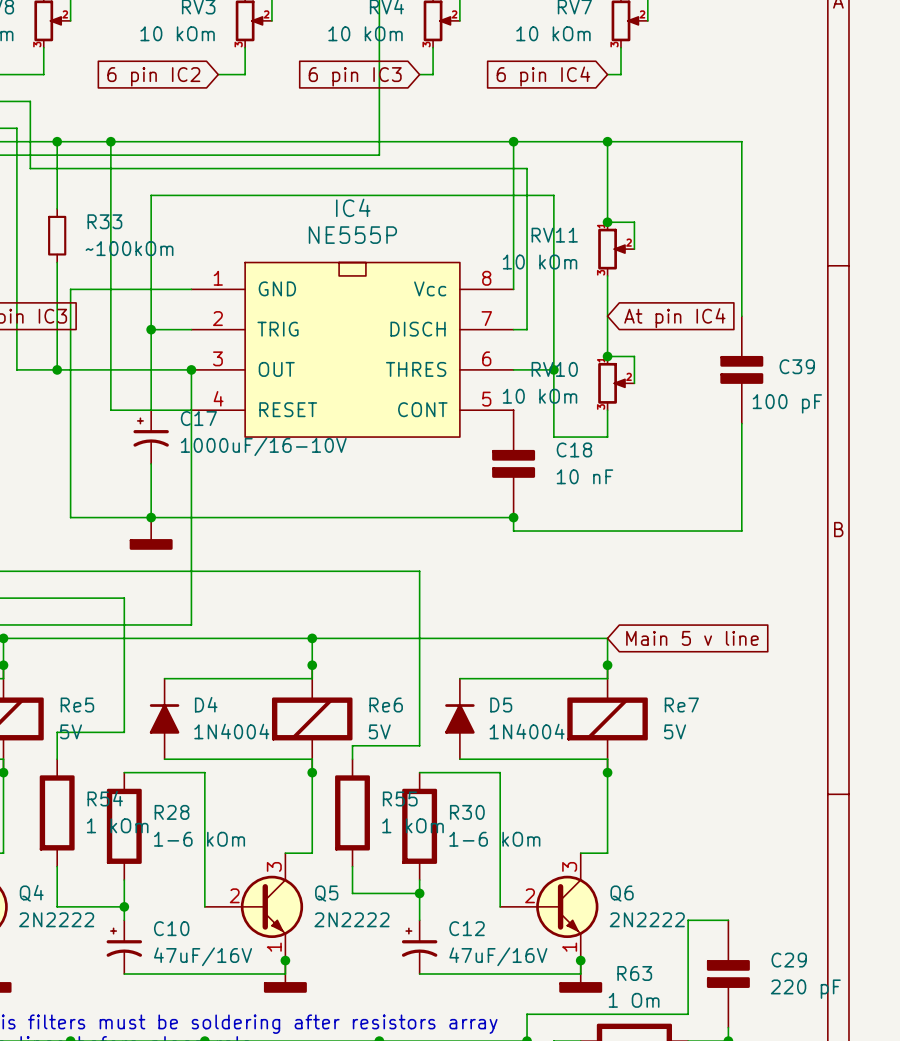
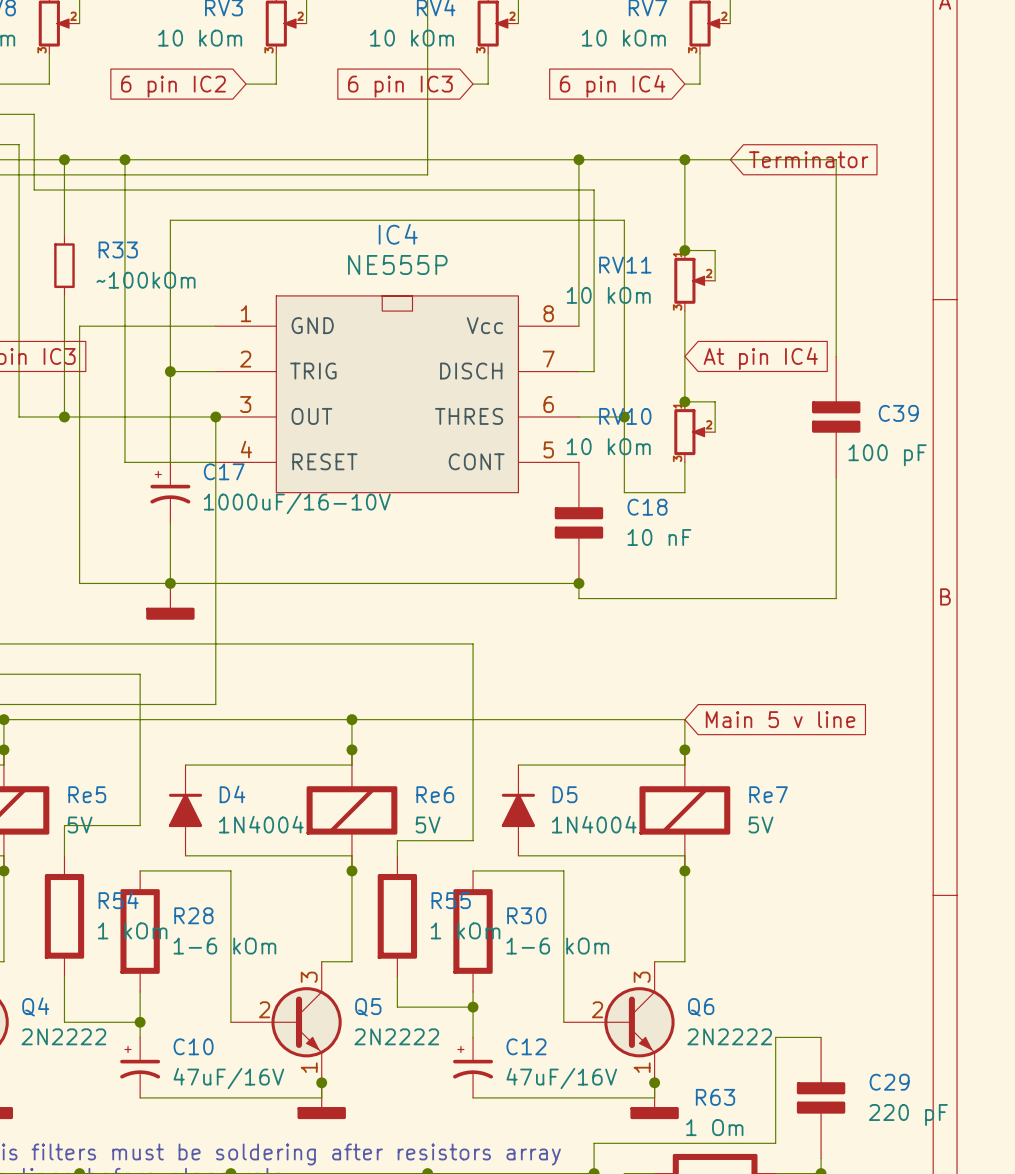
global label: none -> Terminator (808, 159)

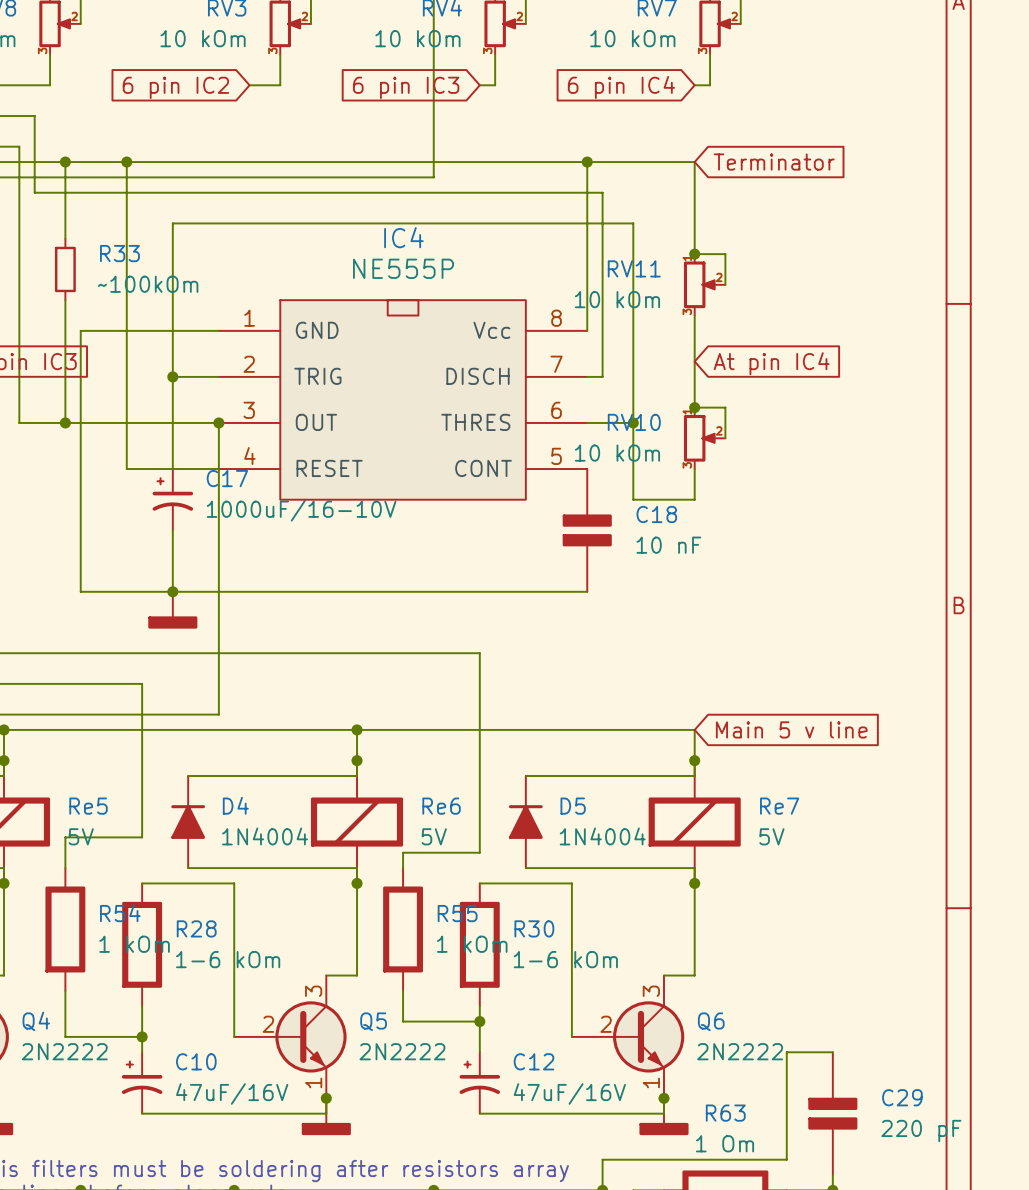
wire: (684, 159) (836, 159) (836, 356) -> none
junction: (684, 159) -> none
global label position: Terminator (808, 159) -> Terminator (774, 162)
C39: 100 pF (836, 416) -> none
wire: (836, 477) (836, 598) (578, 598) (578, 583) -> none
junction: (578, 583) -> none

